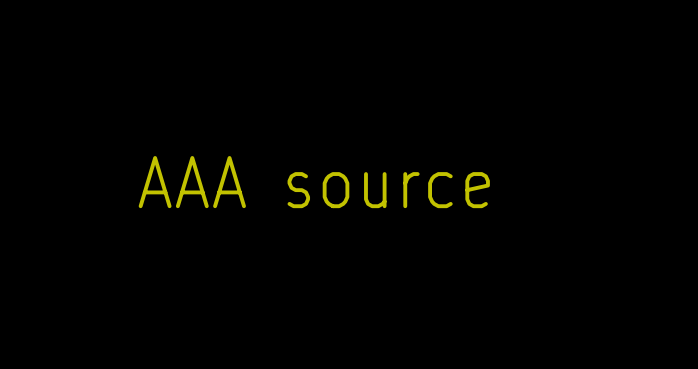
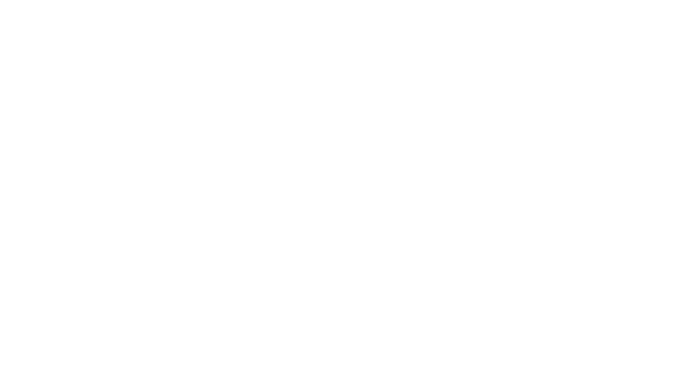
text: AAA source (314, 182) -> none

